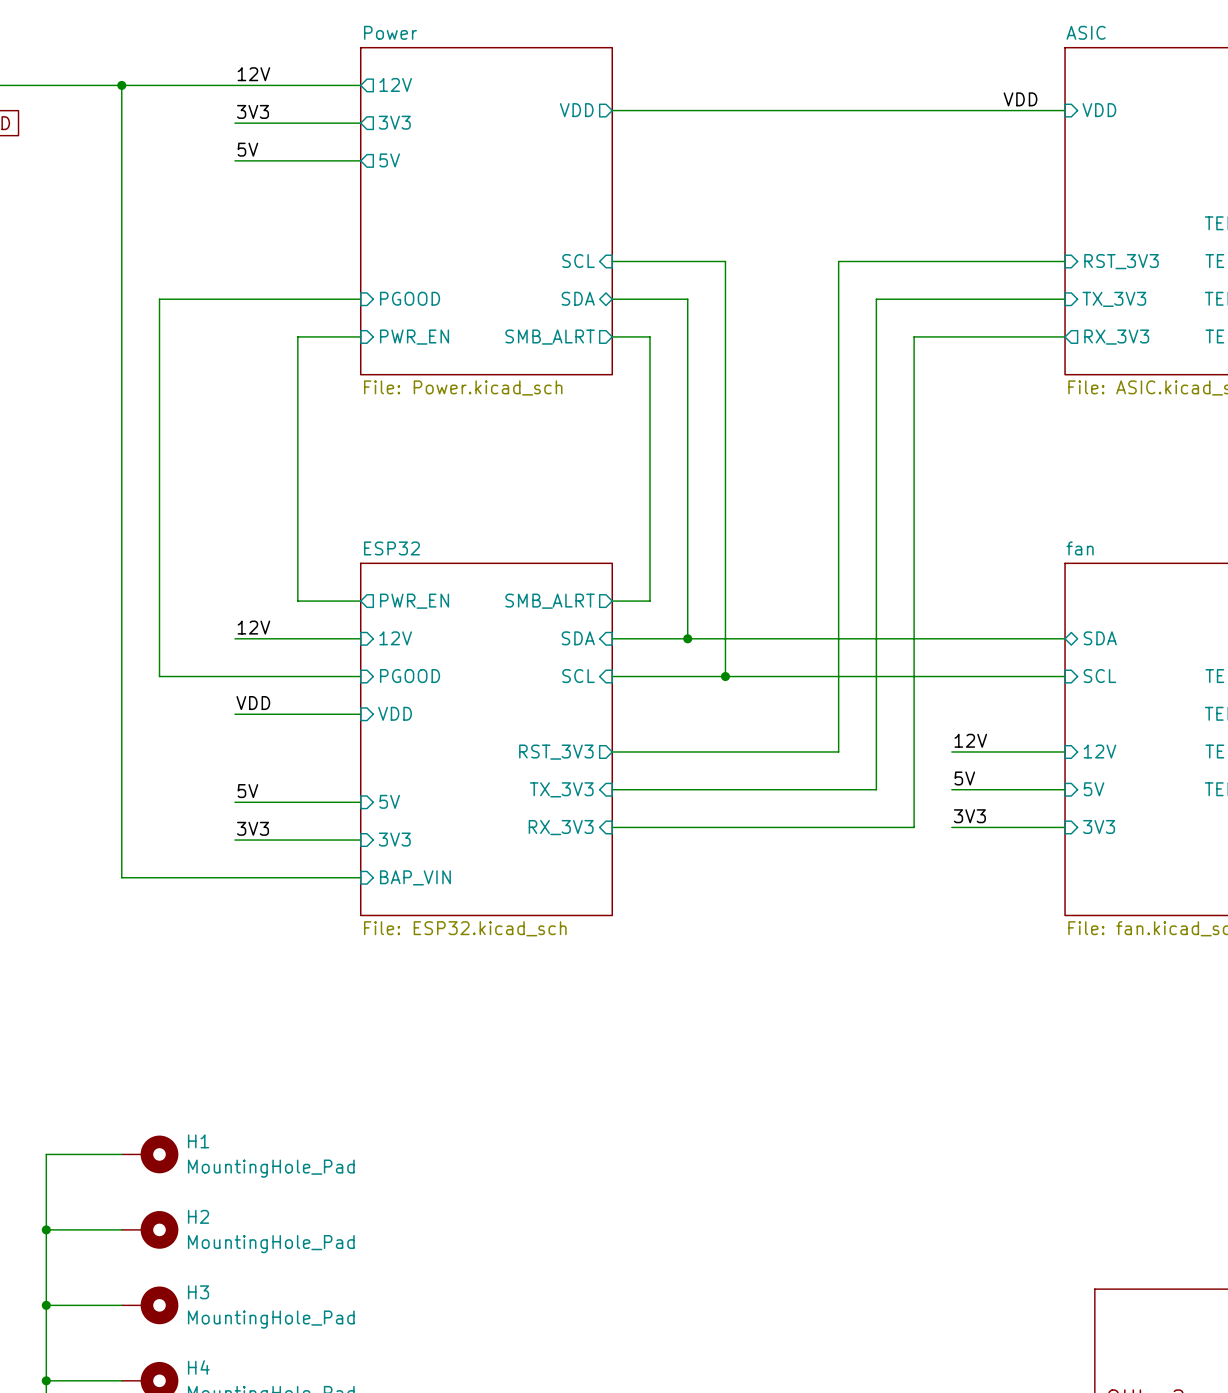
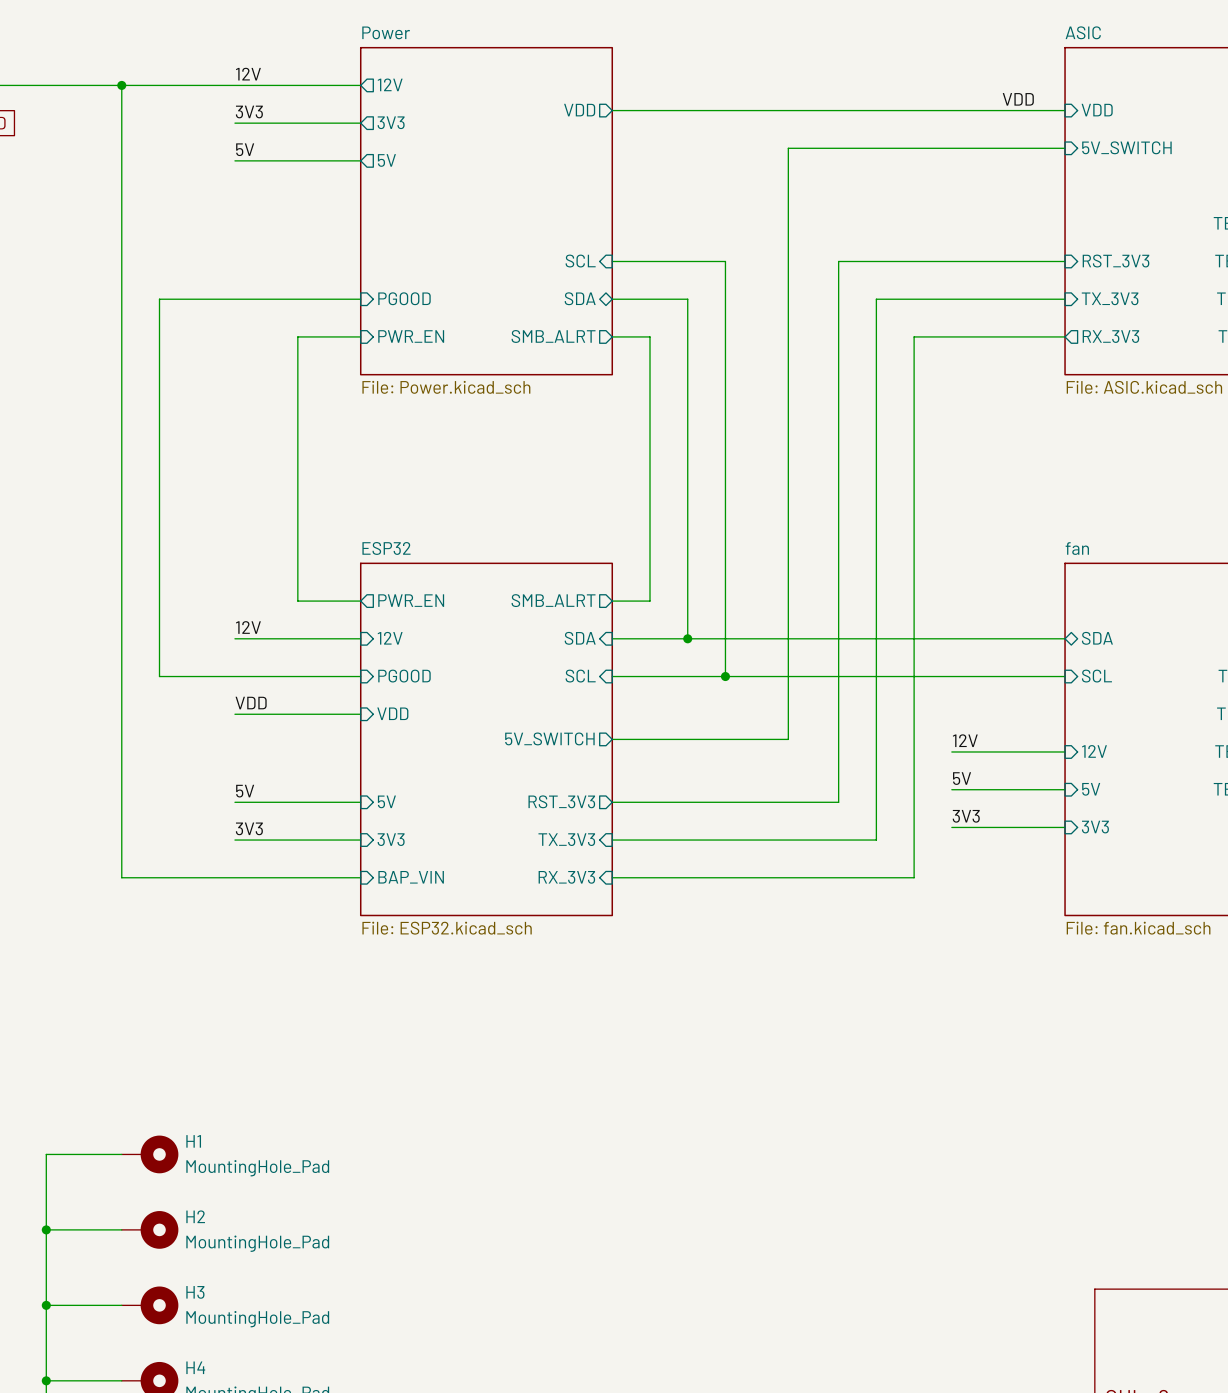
wire: none -> (1065, 148) (788, 148) (788, 739) (612, 739)
sheet pin: none -> 5V_SWITCH (1126, 147)
sheet pin: none -> 5V_SWITCH (549, 738)
wire: (612, 751) (838, 751) -> (612, 802) (838, 802) (838, 751)
sheet pin position: RST_3V3 (556, 752) -> RST_3V3 (561, 801)
sheet pin position: TX_3V3 (561, 789) -> TX_3V3 (566, 839)
wire: (612, 789) (876, 789) -> (612, 840) (876, 840) (876, 789)
sheet pin position: RX_3V3 (561, 827) -> RX_3V3 (566, 877)
wire: (612, 827) (914, 827) -> (612, 877) (914, 877) (914, 827)

